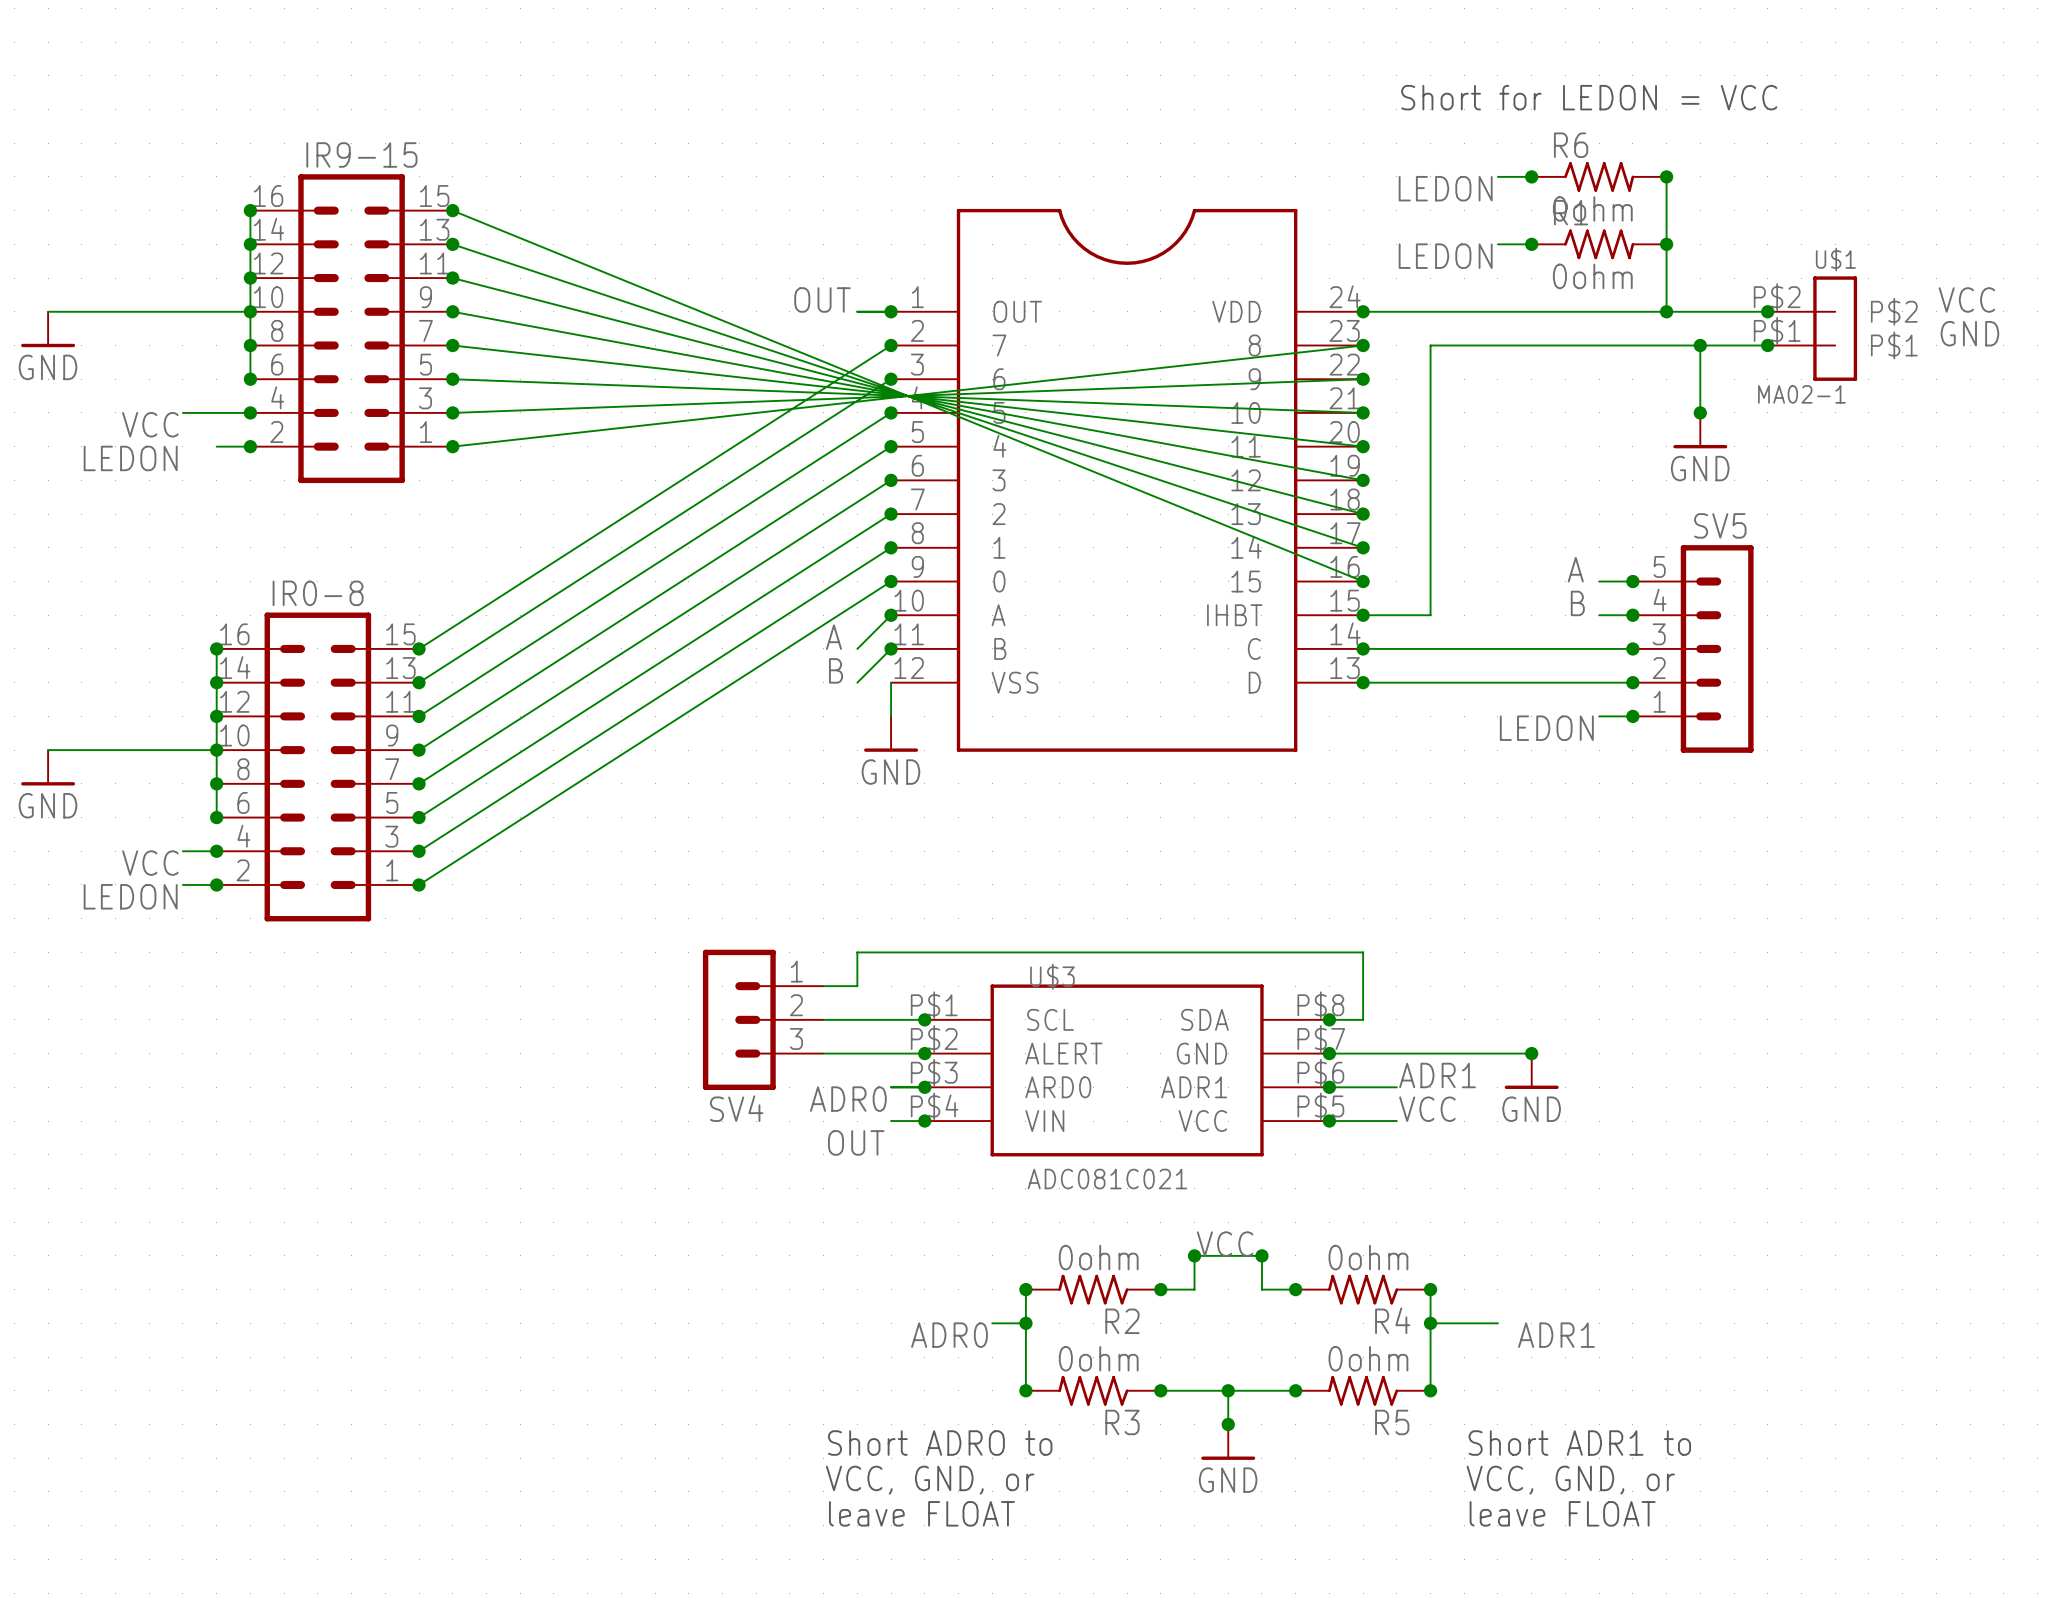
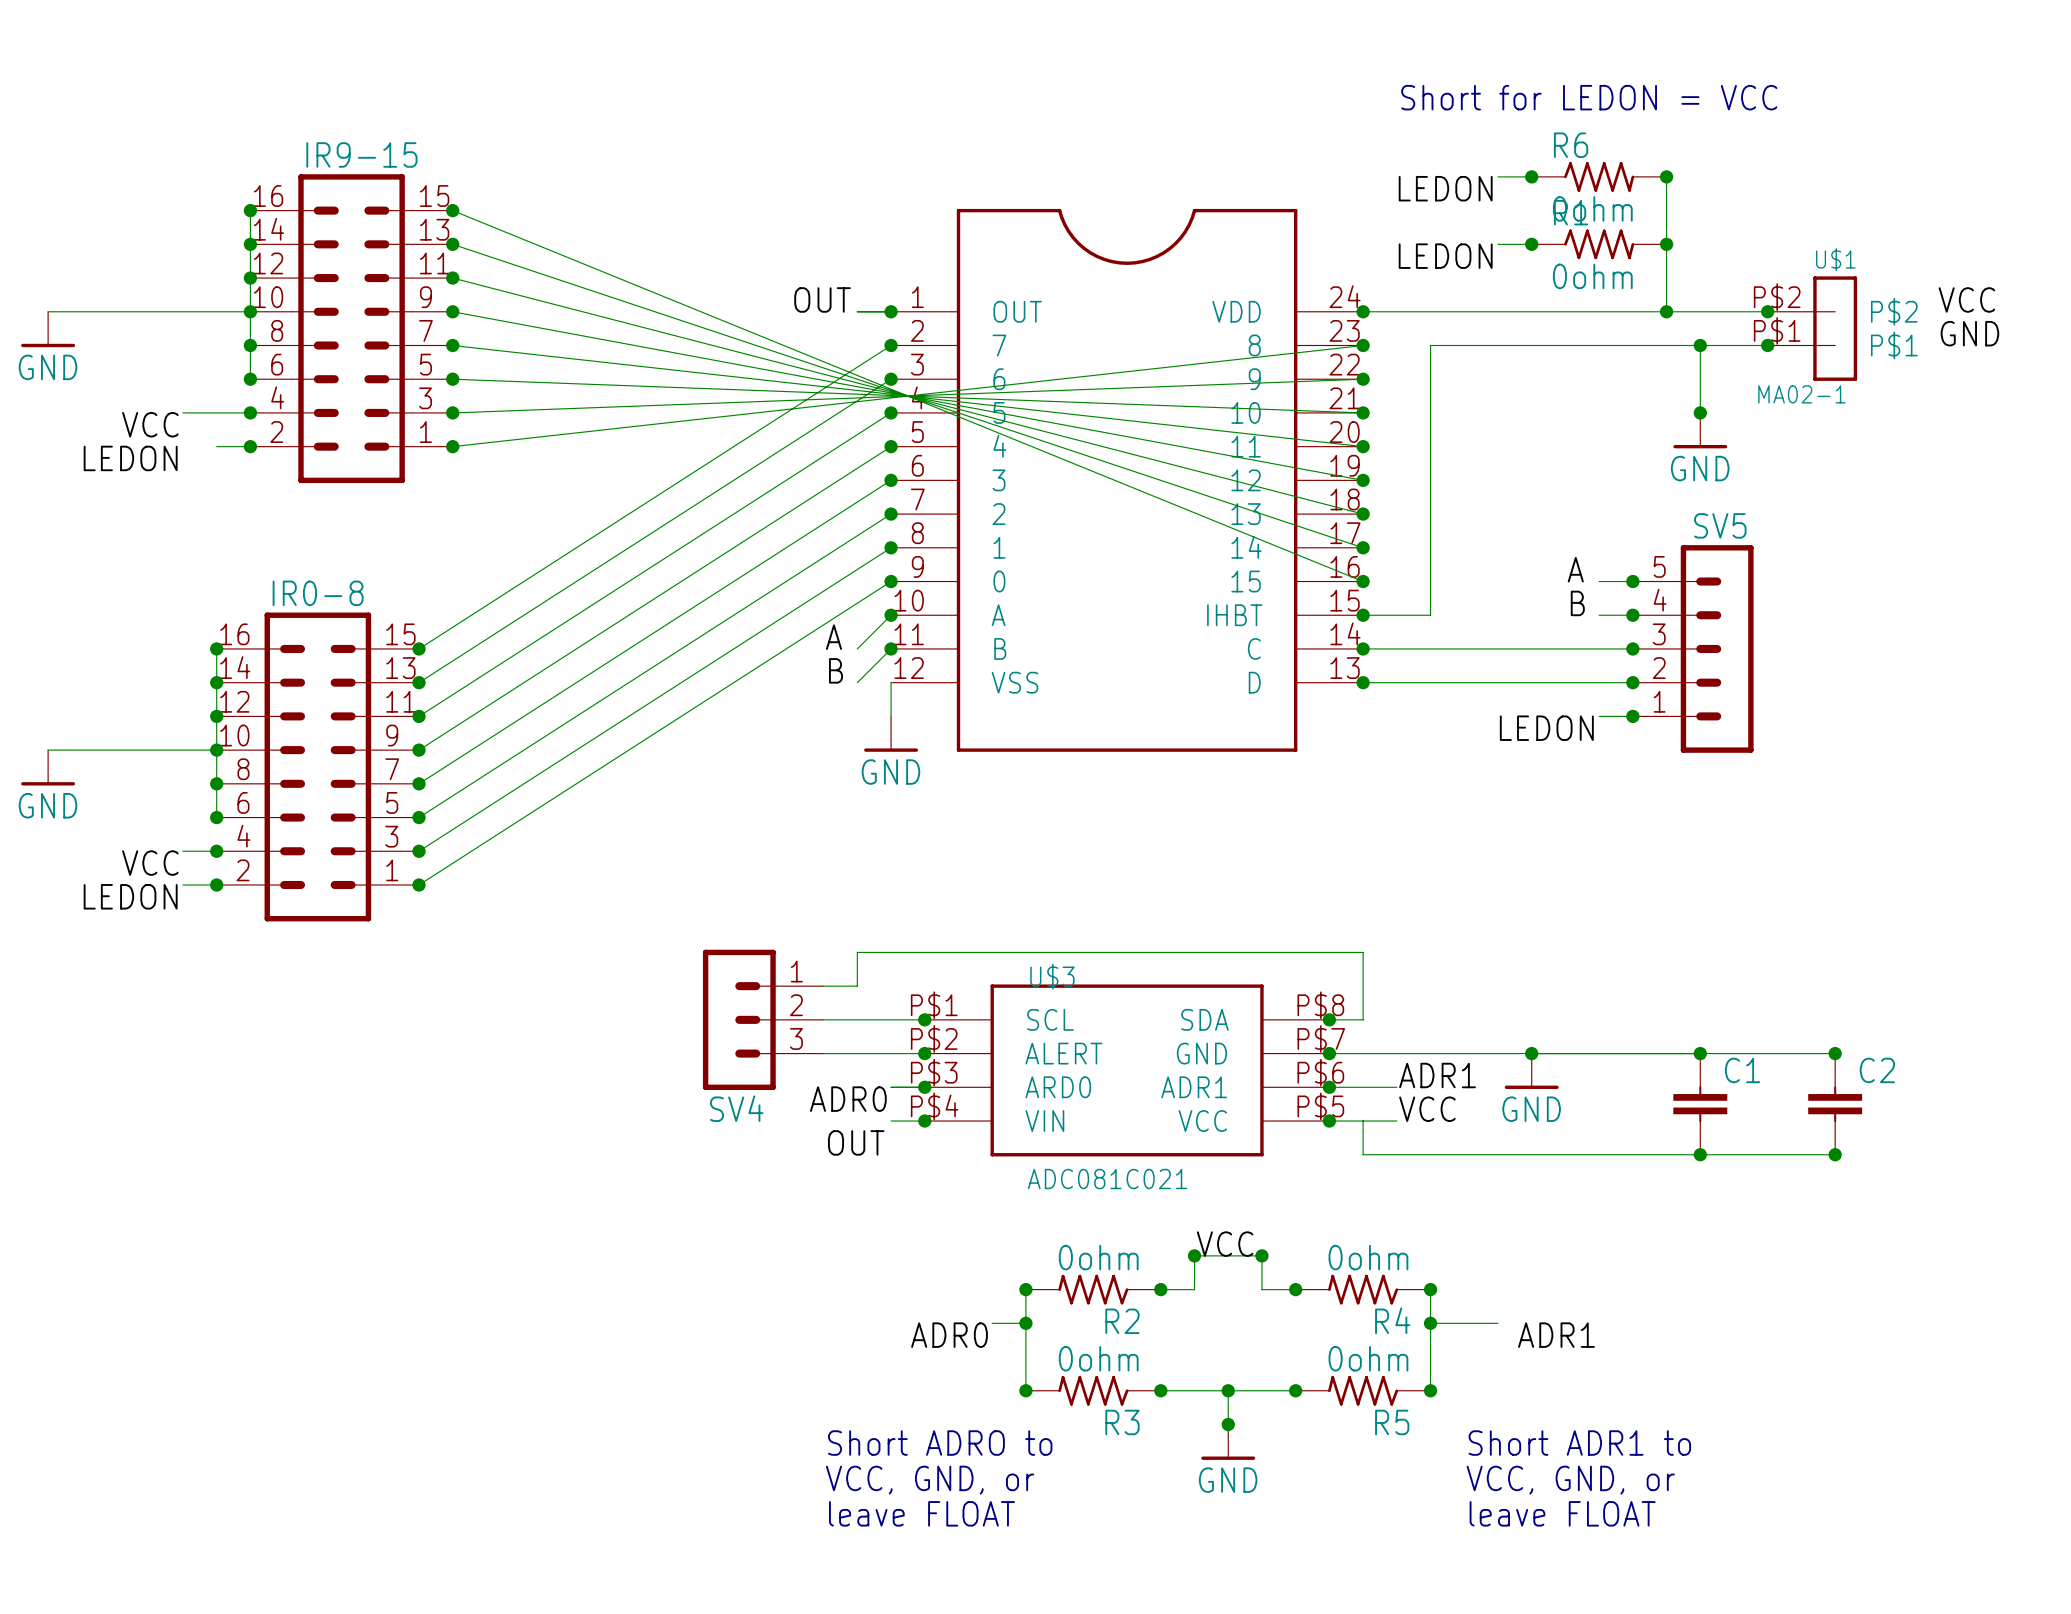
wire: none -> (1531, 1053) (1835, 1053)
junction: none -> (1700, 1053)
junction: none -> (1835, 1053)
C1: none -> (1700, 1104)
C2: none -> (1835, 1104)
wire: none -> (1363, 1121) (1363, 1154) (1835, 1154)
junction: none -> (1700, 1154)
junction: none -> (1835, 1154)

